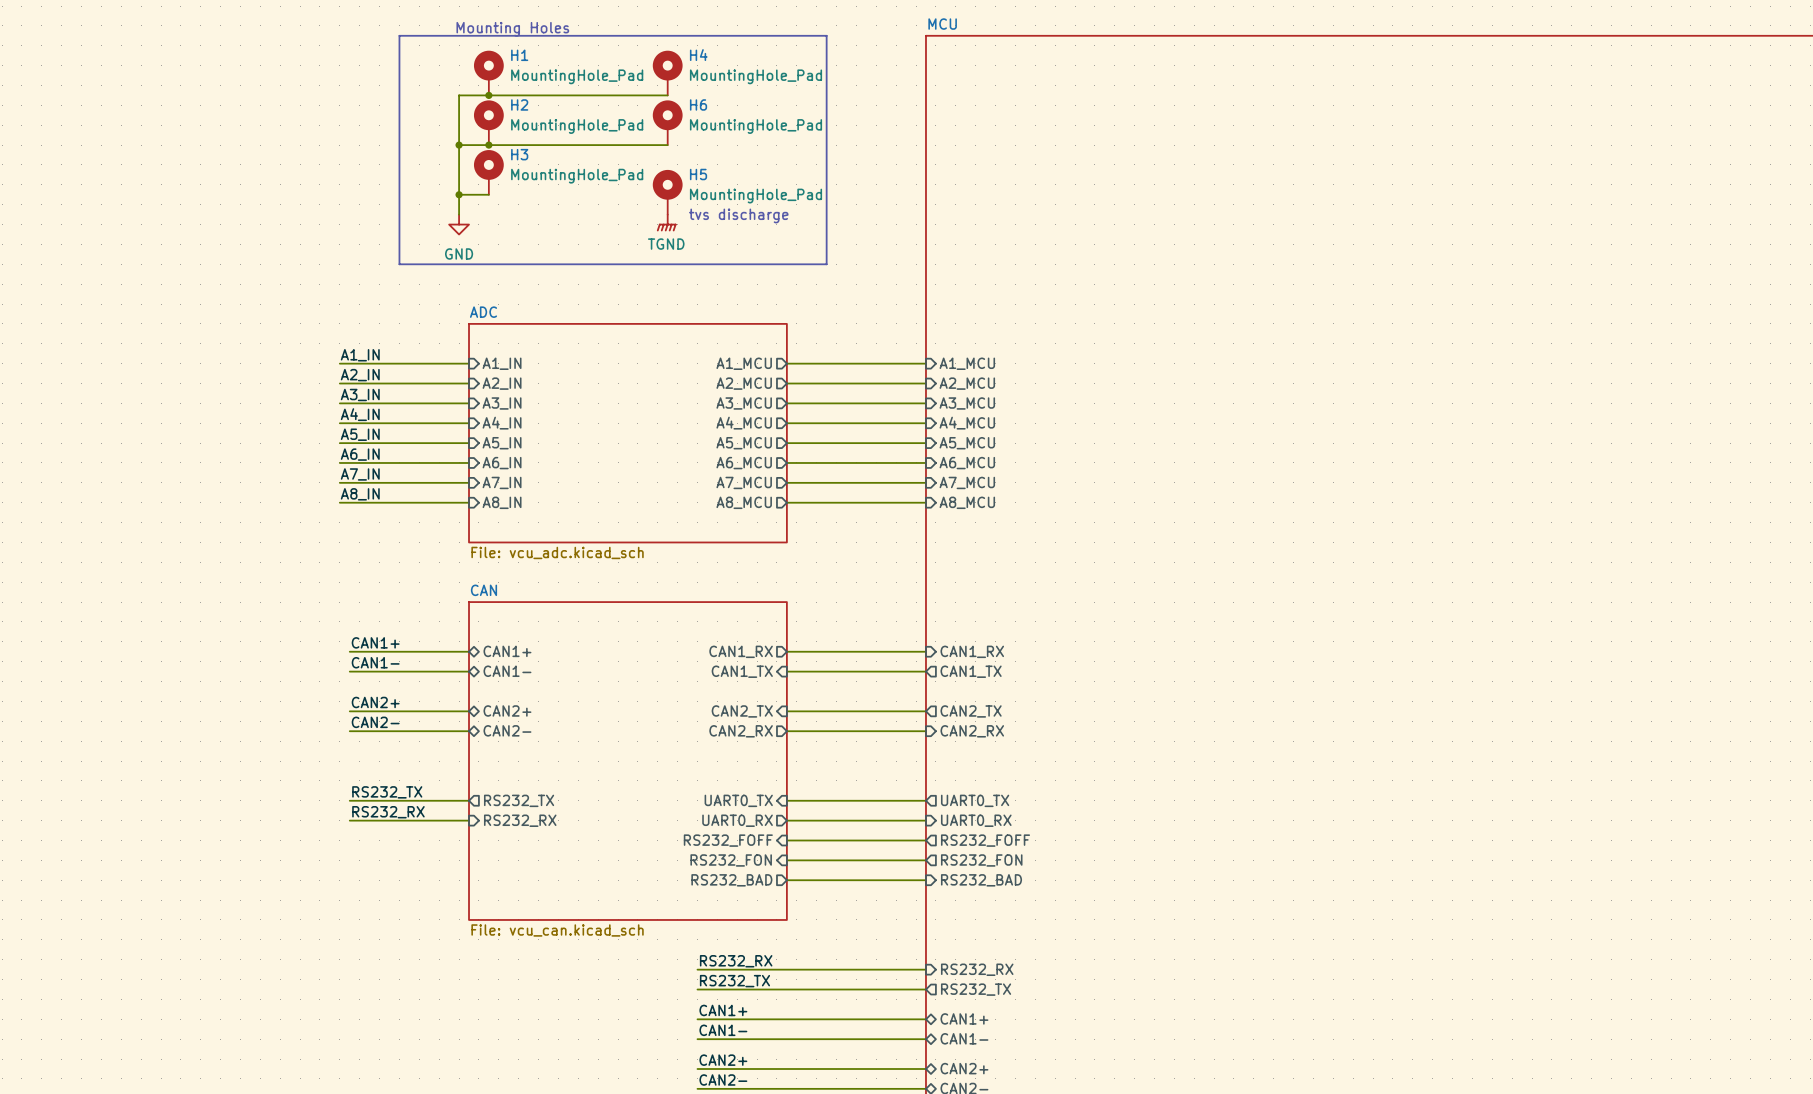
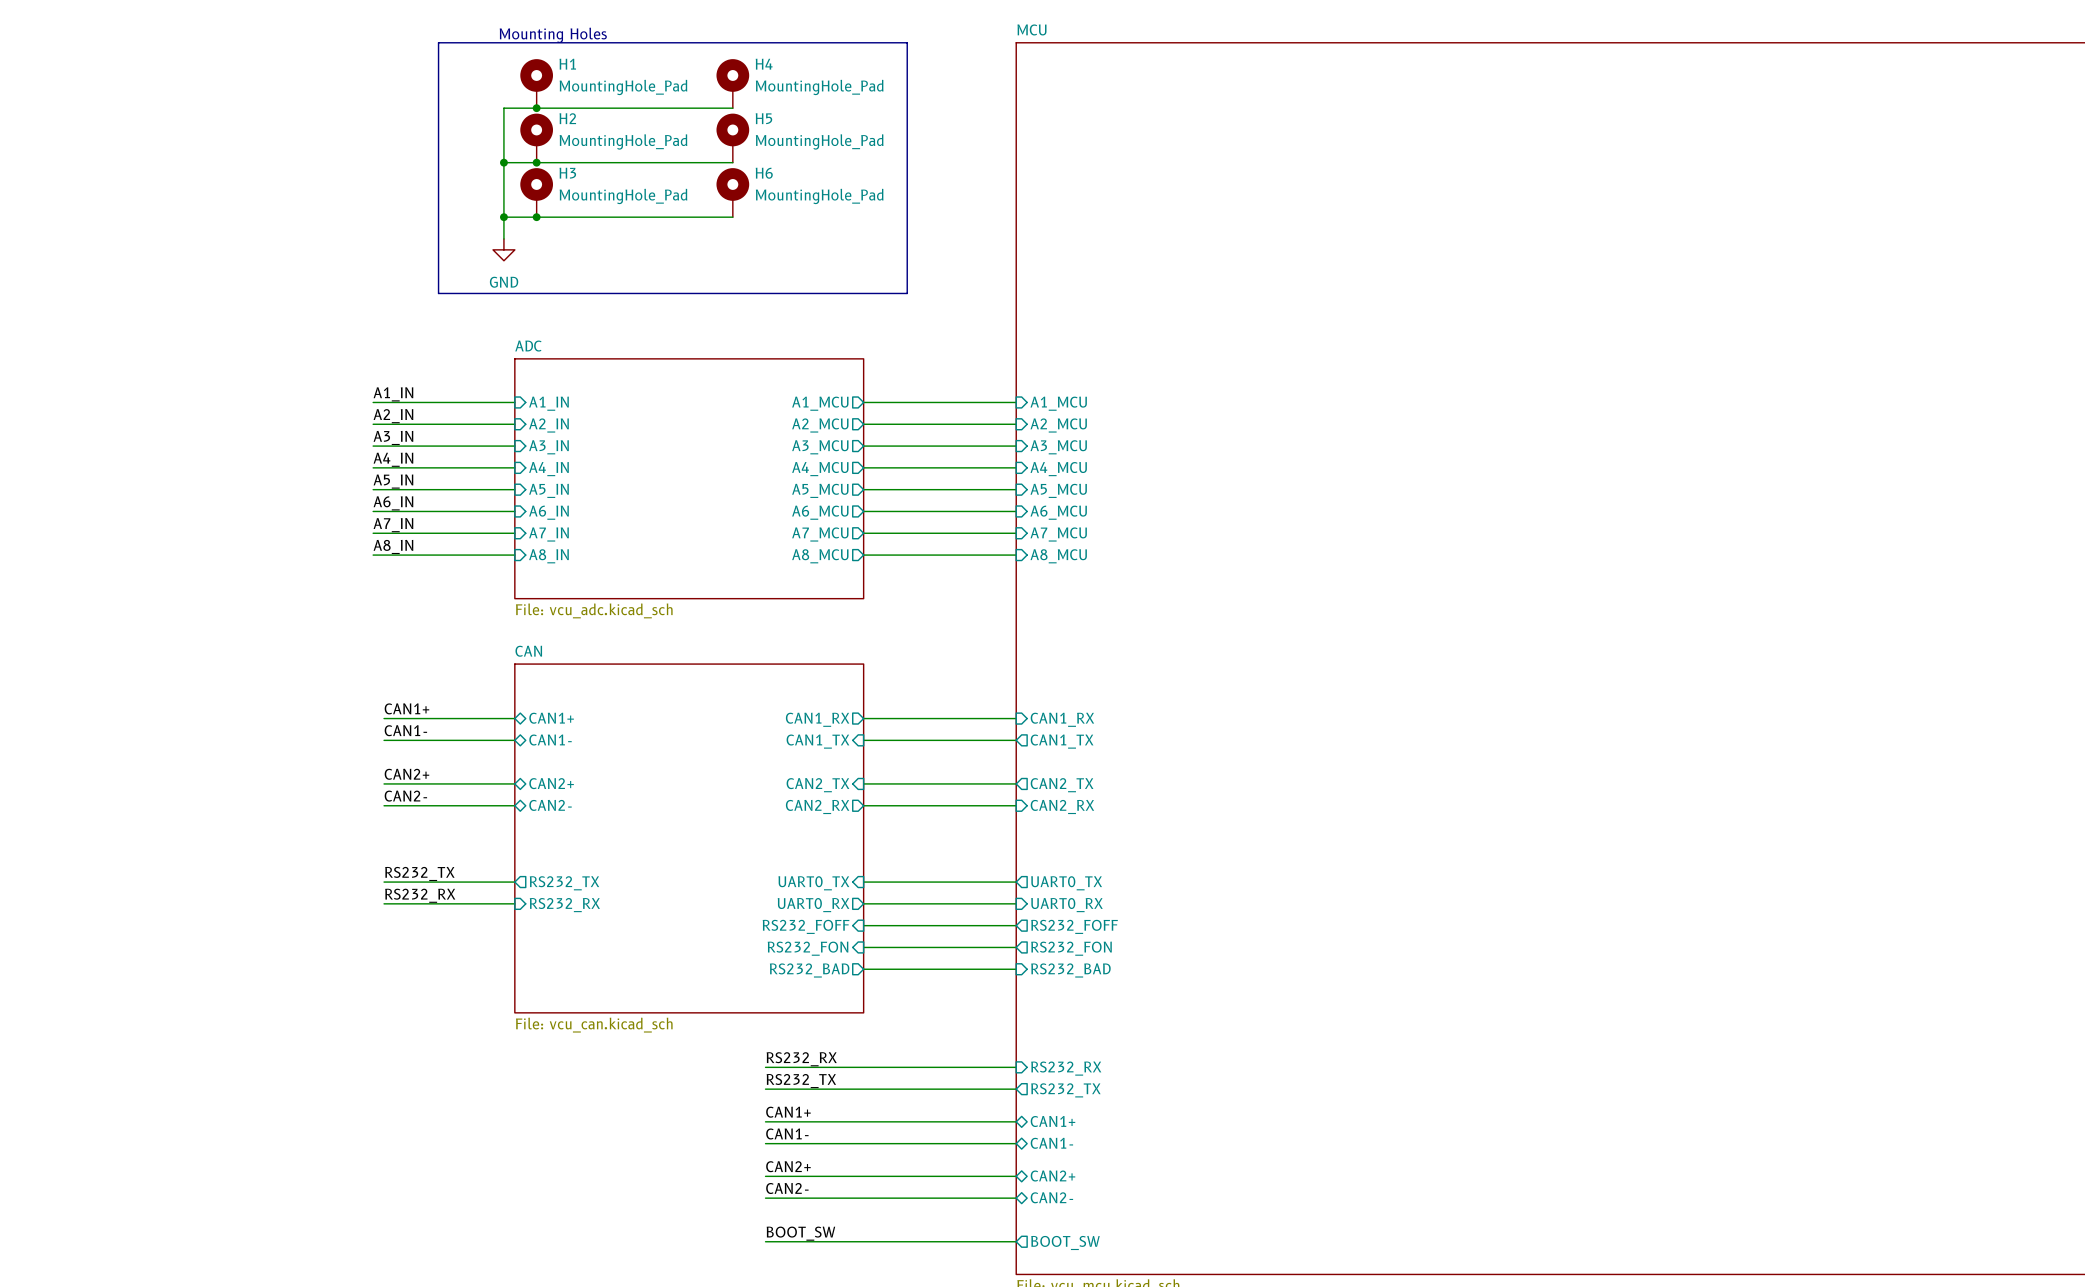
H6 name: H6 (698, 104) -> H5 (763, 118)
H6: none -> MountingHole_Pad (732, 192)
H5: MountingHole_Pad (667, 192) -> none
wire: none -> (536, 217) (732, 217)
junction: none -> (536, 217)
text: tvs discharge (738, 215) -> none
power symbol: TGND (666, 222) -> none

